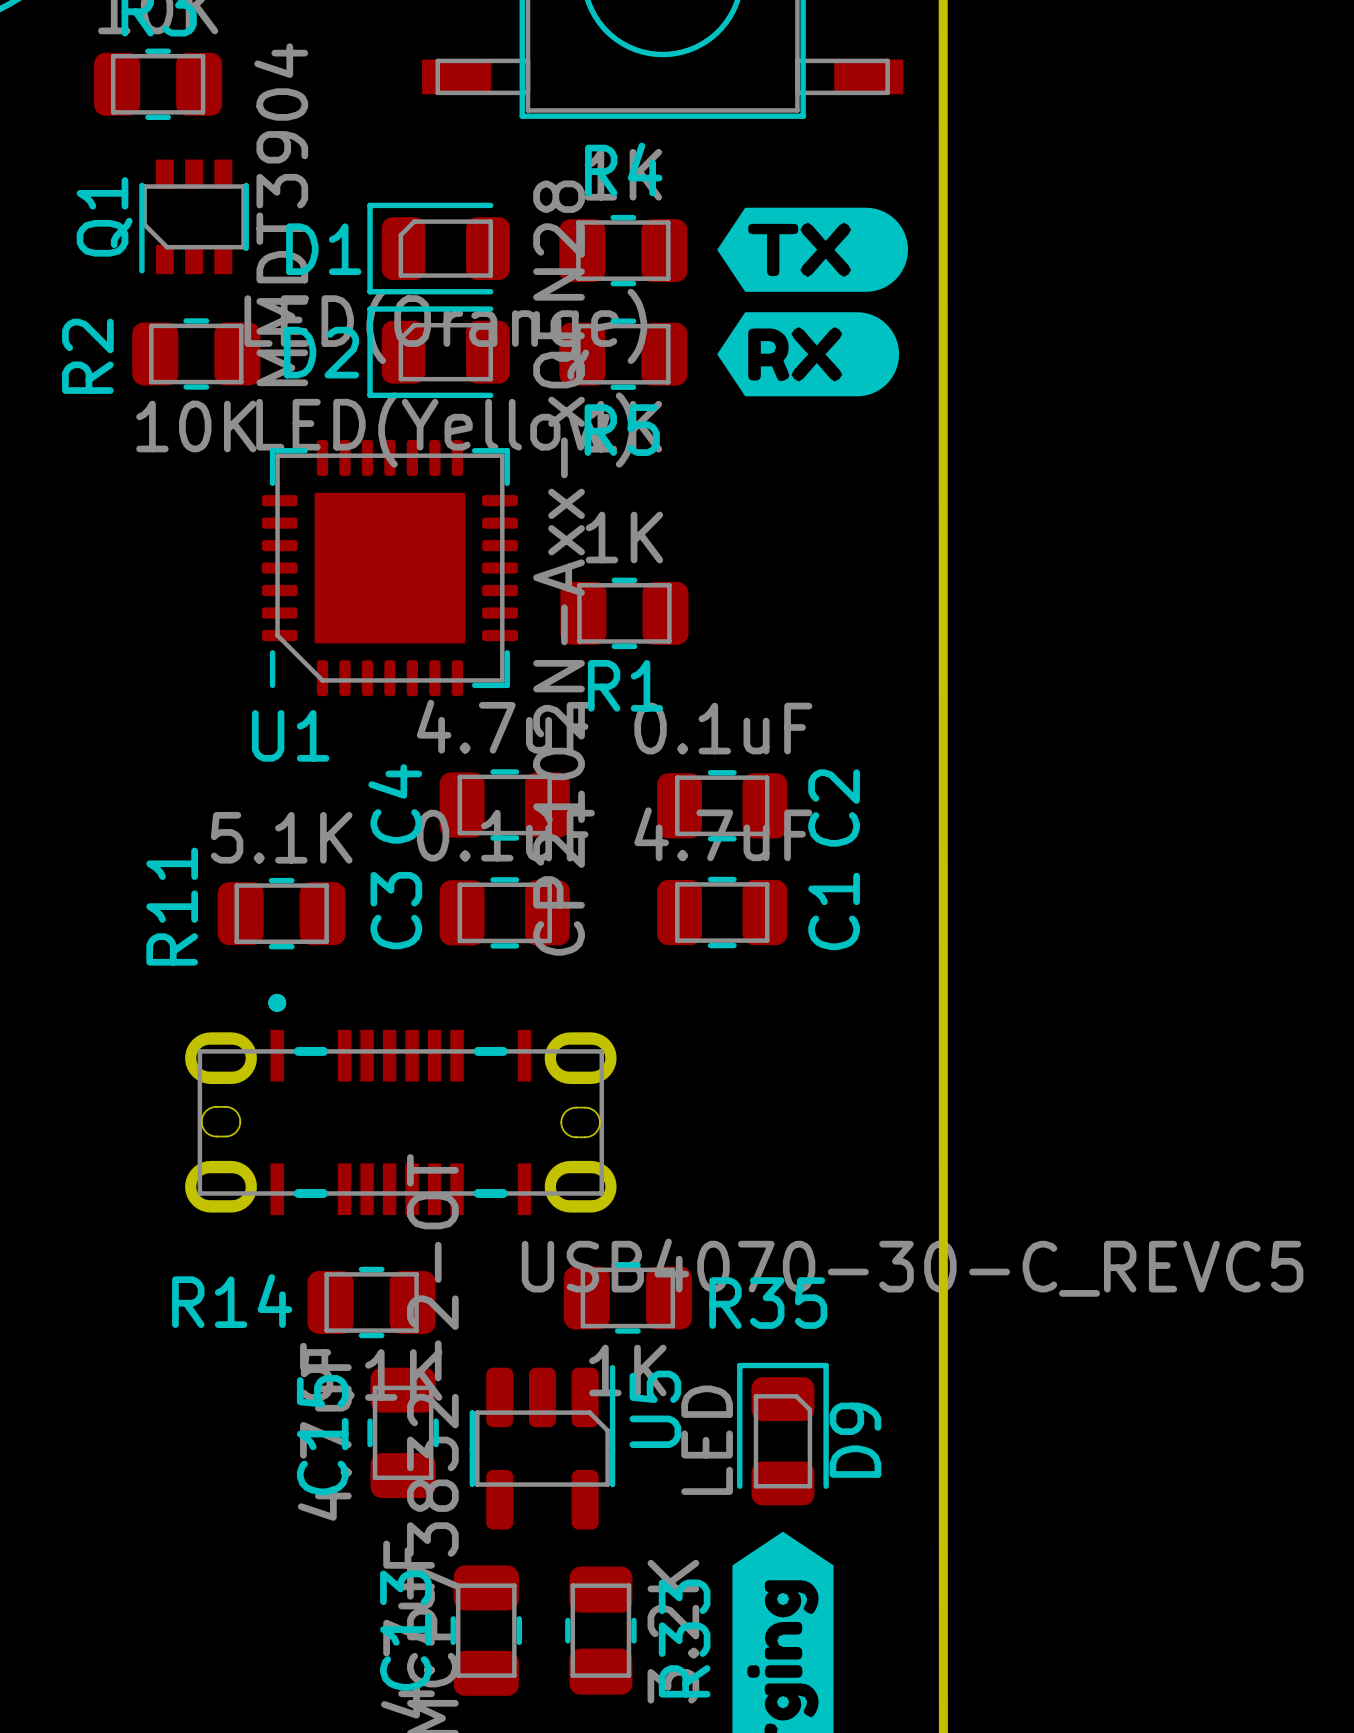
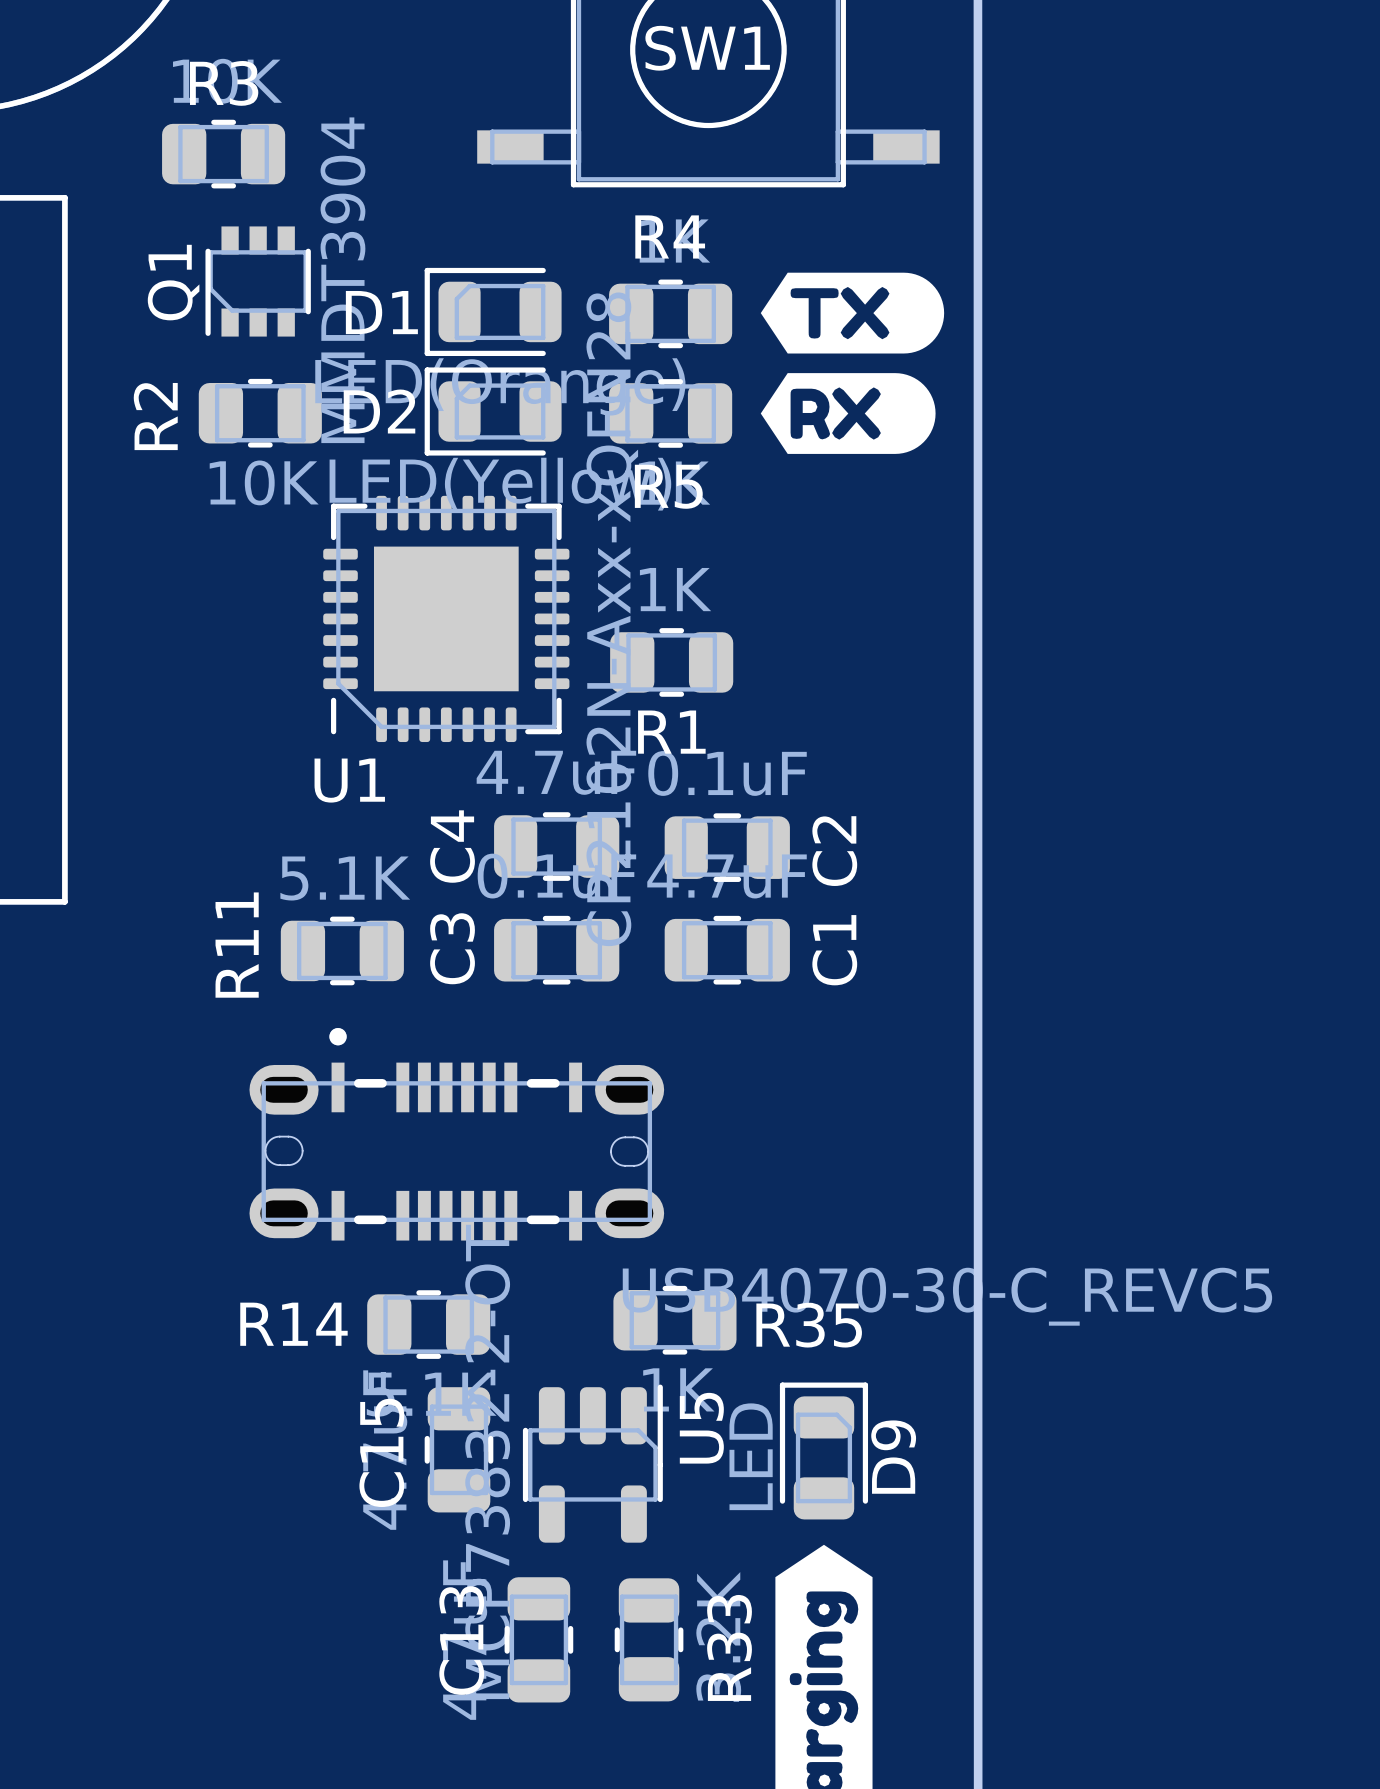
C2 position: (722, 805) -> (727, 847)
C1 position: (722, 912) -> (727, 950)

